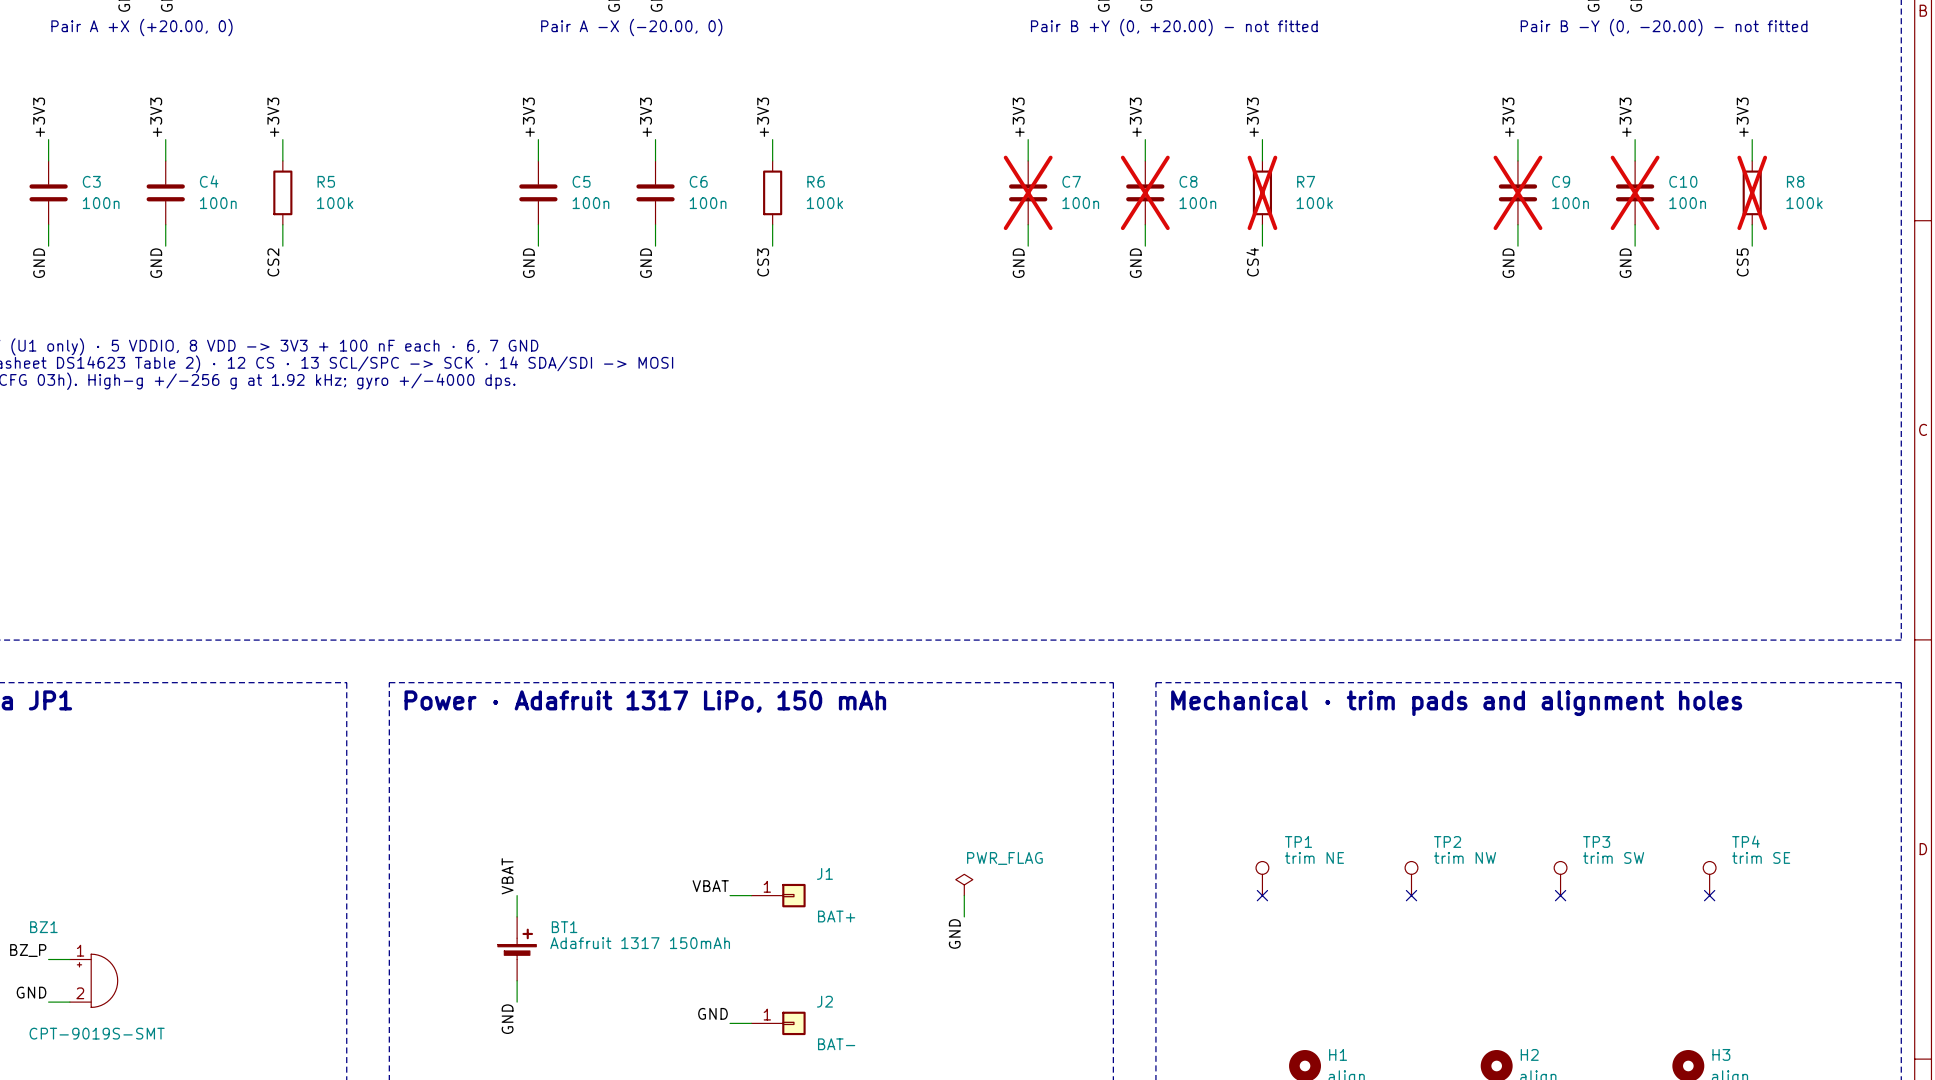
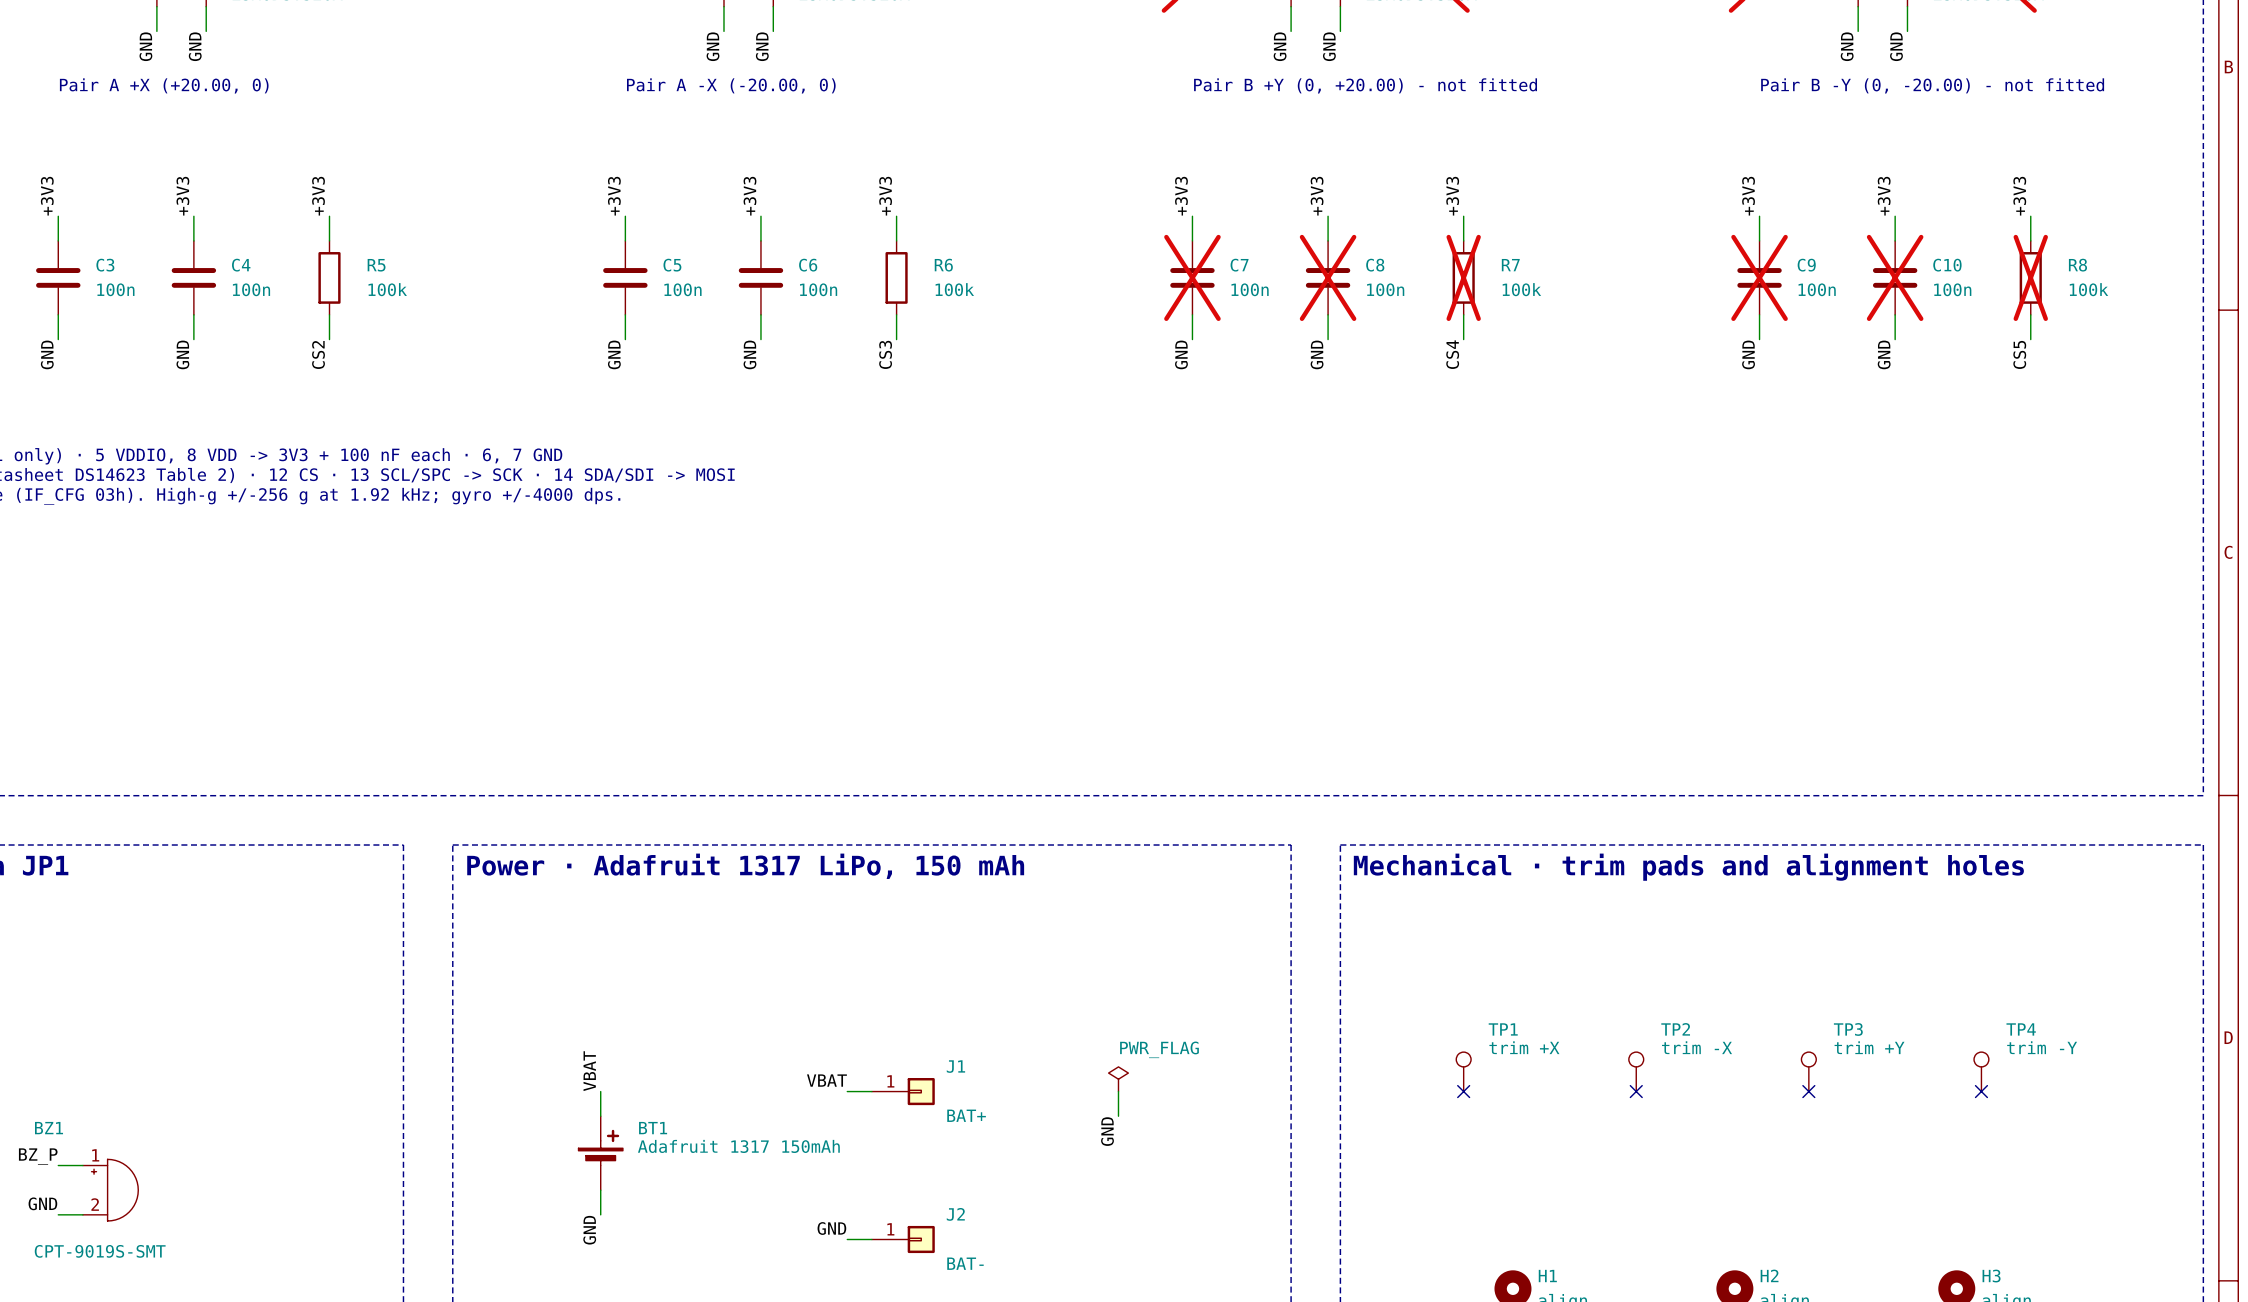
TP1 value: trim NE (1314, 857) -> trim +X (1524, 1047)
TP2 value: trim NW (1465, 857) -> trim -X (1697, 1047)
TP3 value: trim SW (1613, 857) -> trim +Y (1869, 1047)
TP4 value: trim SE (1761, 857) -> trim -Y (2042, 1047)

